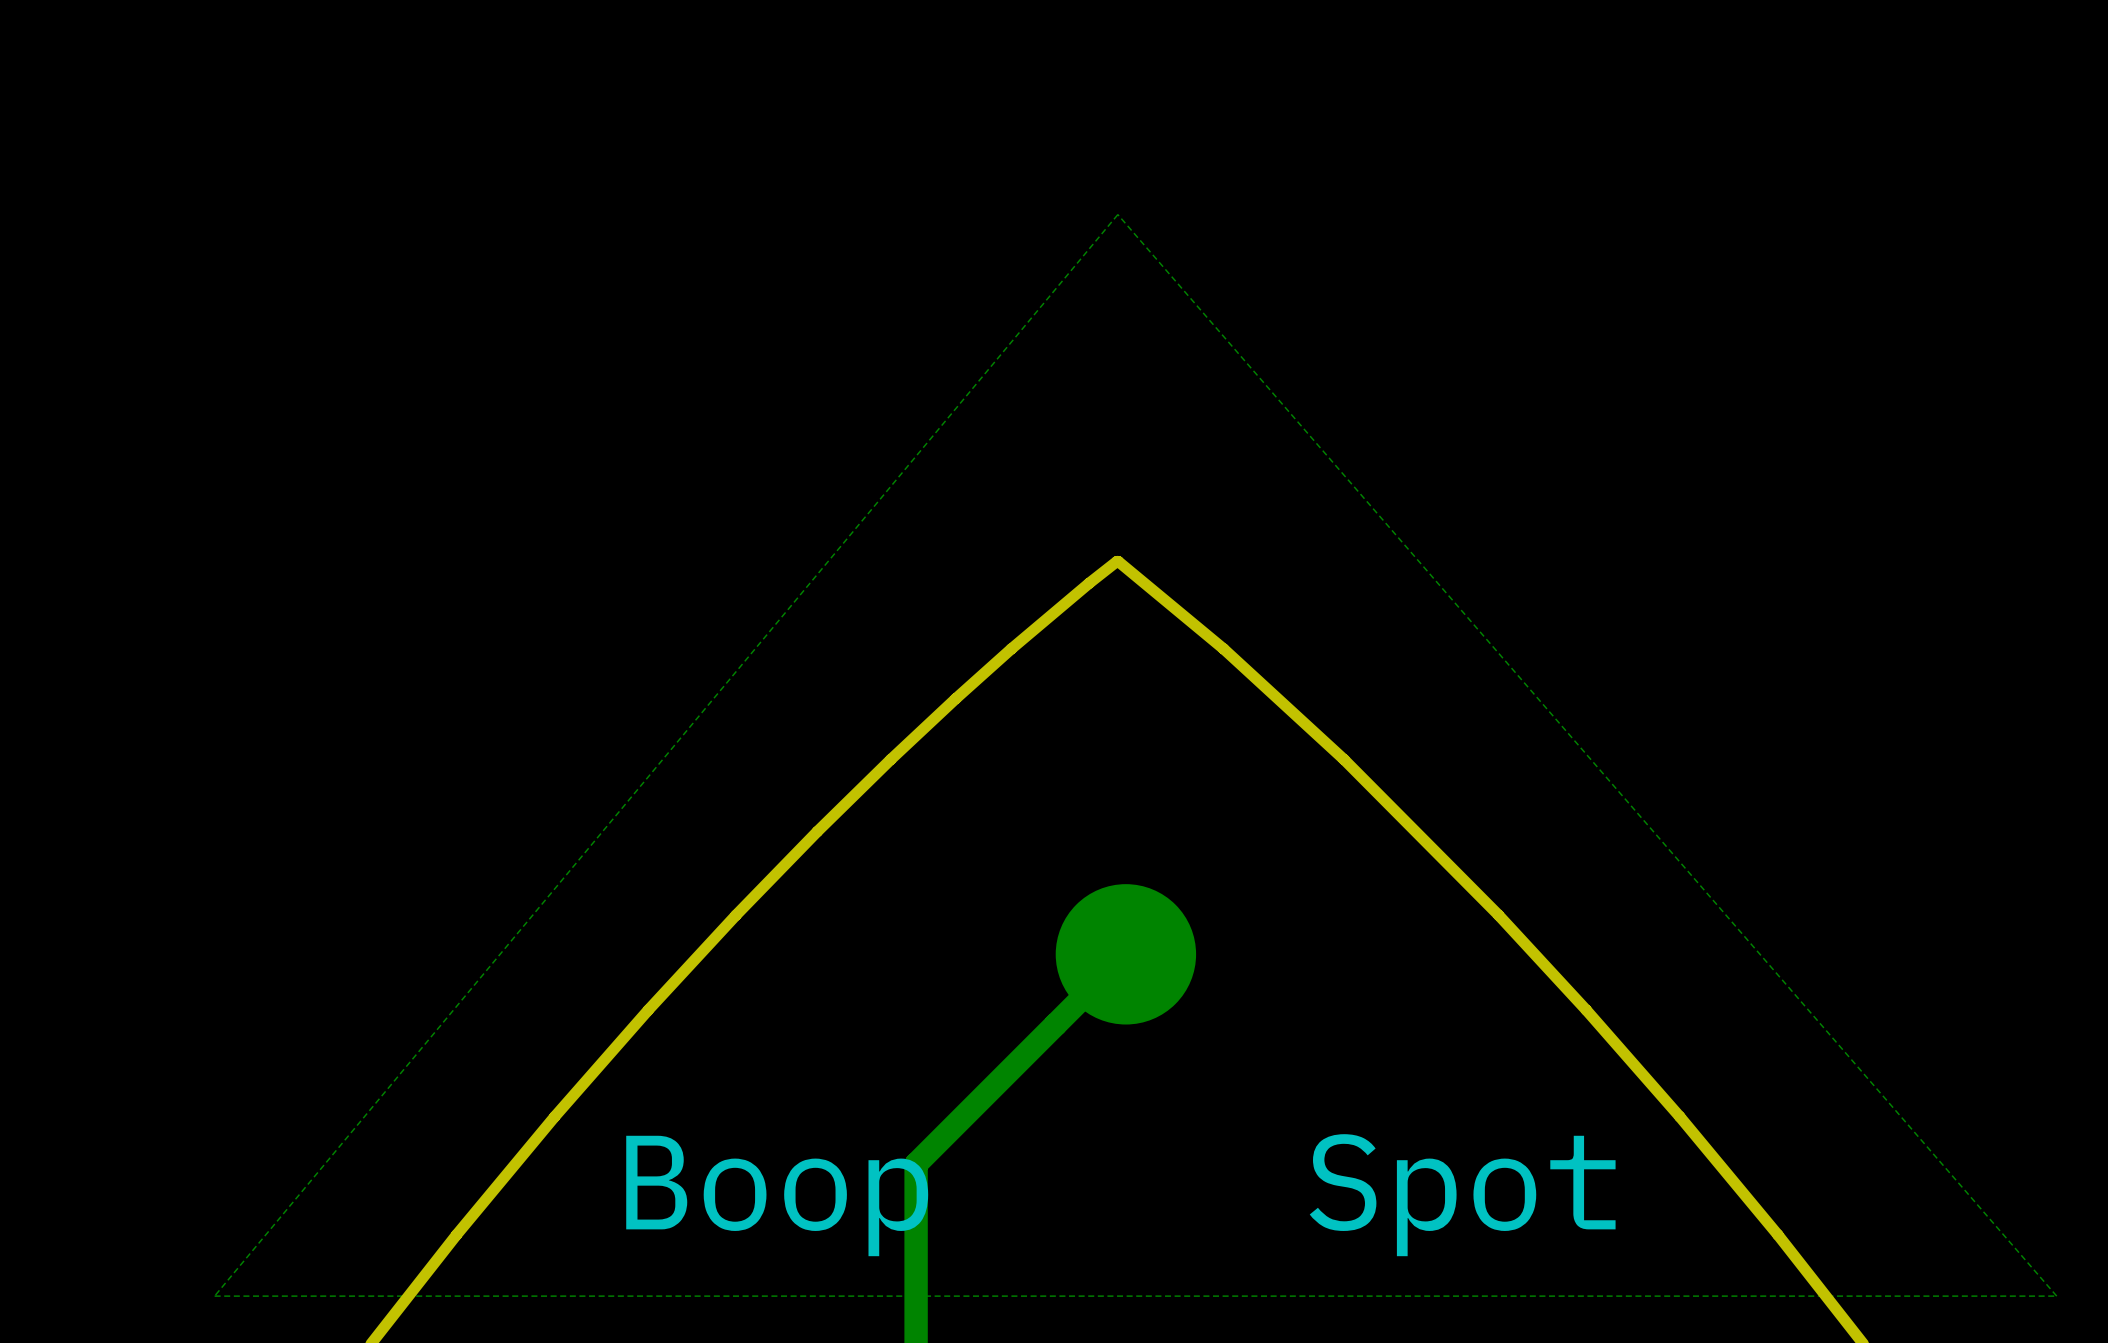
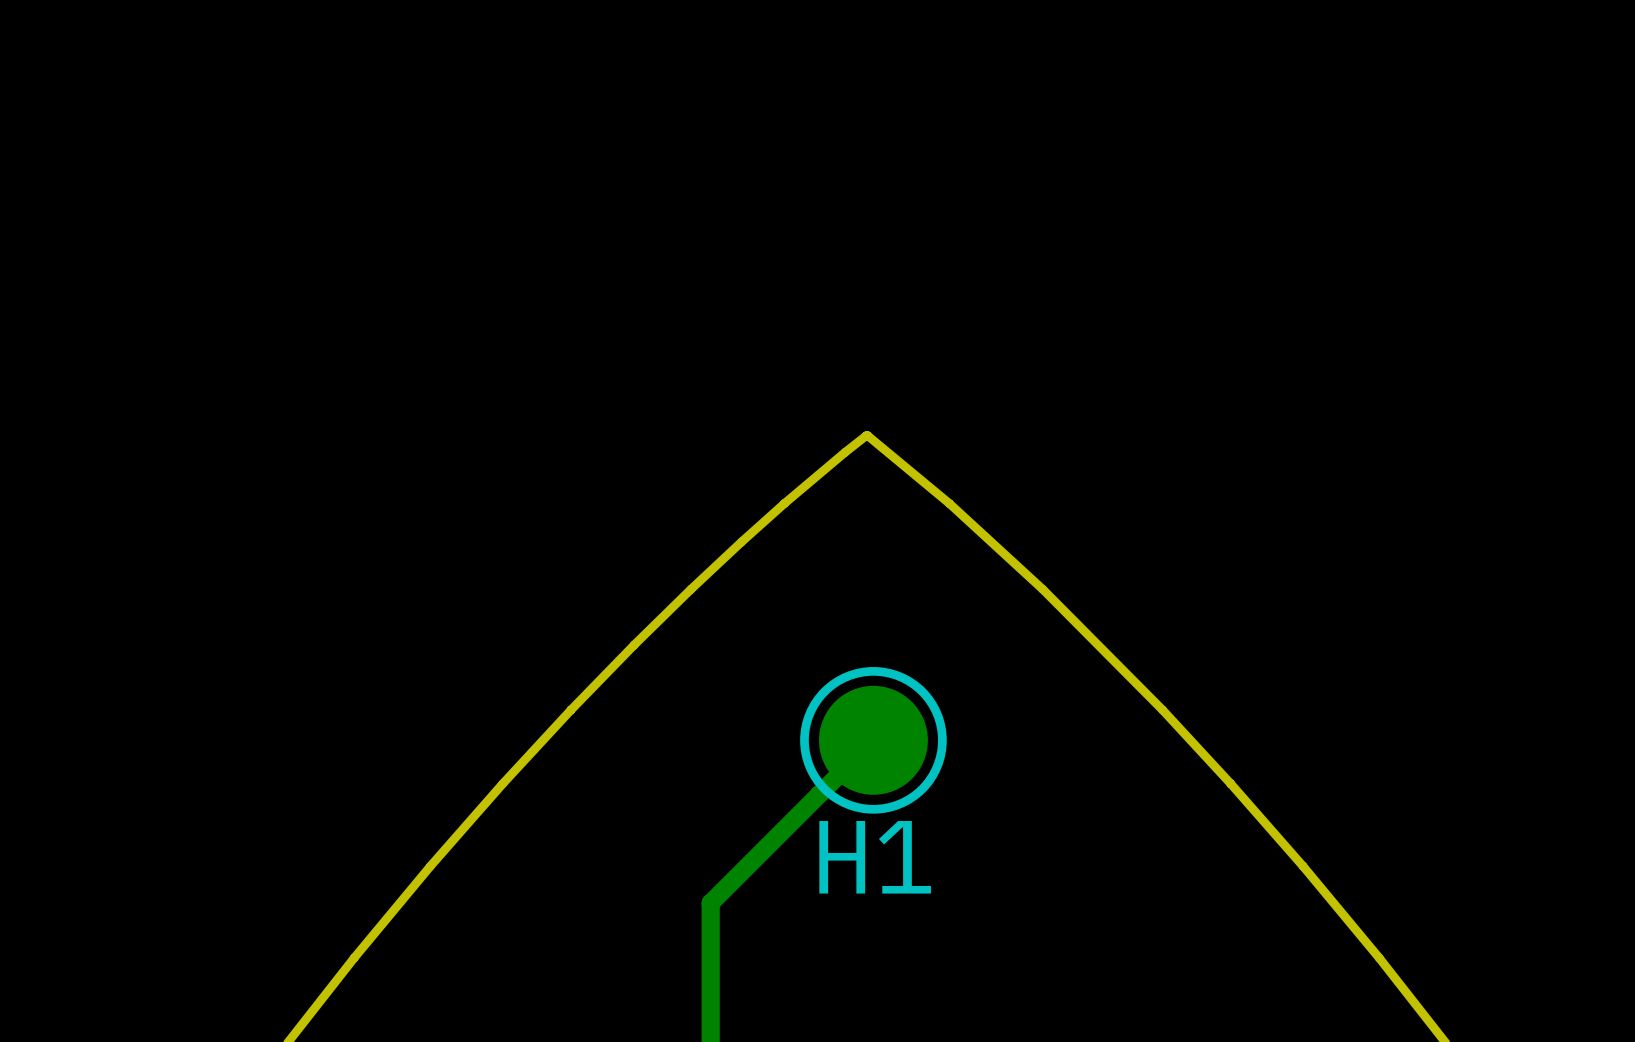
zone outline: (1117, 214) (2056, 1296) (214, 1296) (1117, 214) -> none
H1: none -> (873, 740)
text: Boop (777, 1195) -> none
text: Spot (1462, 1195) -> none

